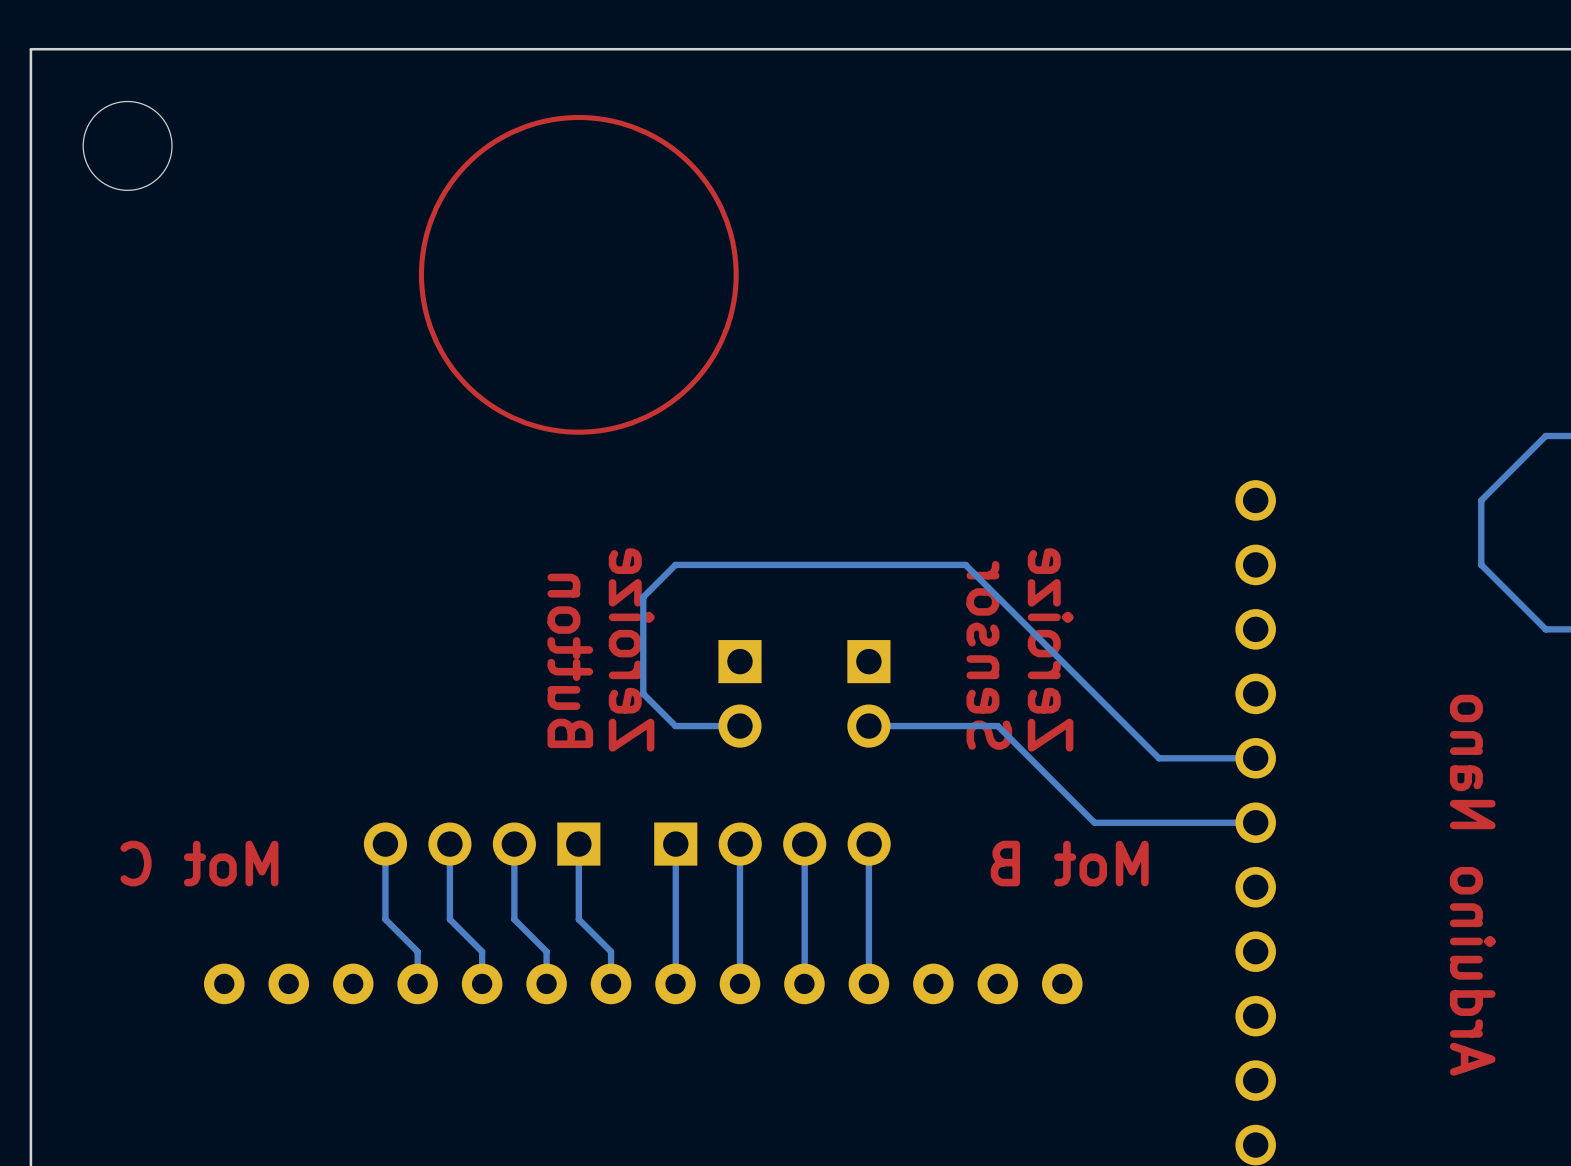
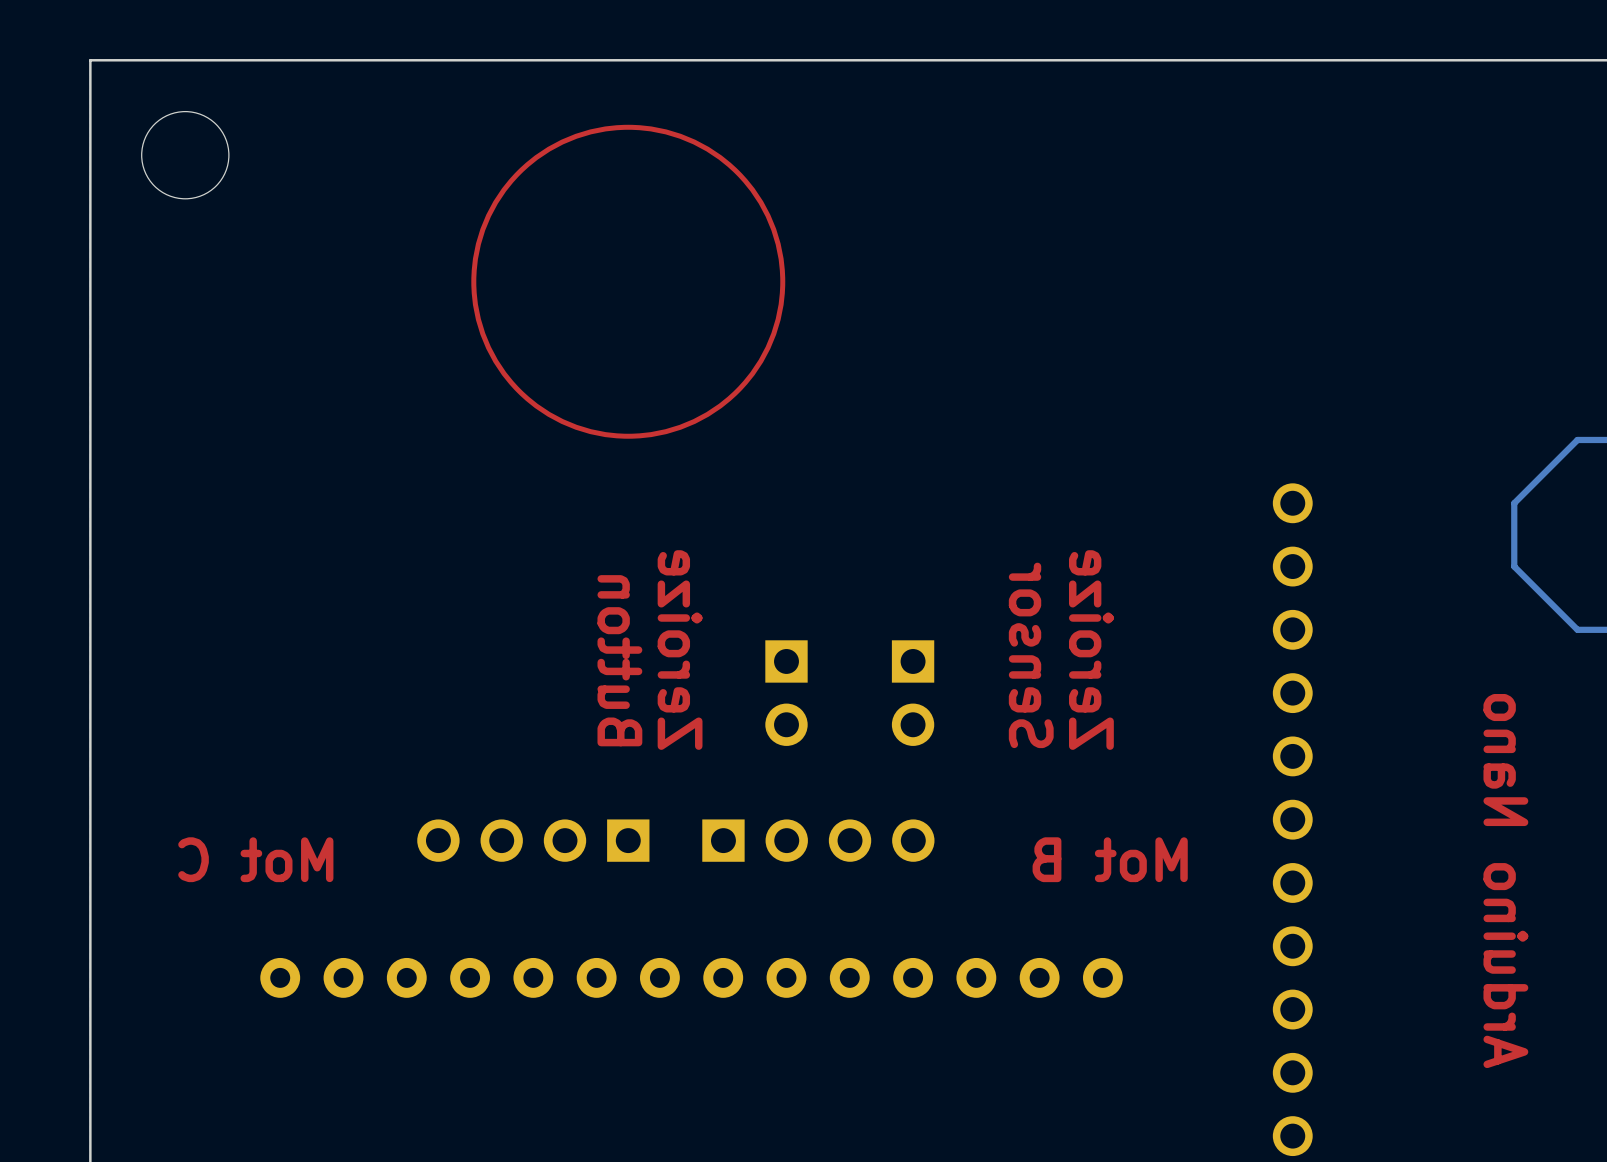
bottom track: (739, 726) (675, 726) (643, 693) (643, 597) (675, 564) (965, 564) (1158, 758) (1255, 758) -> none
bottom track: (868, 726) (997, 726) (1094, 822) (1255, 822) -> none
bottom track: (385, 844) (385, 919) (417, 951) (417, 983) -> none
bottom track: (449, 844) (449, 919) (482, 951) (482, 983) -> none
bottom track: (514, 844) (514, 919) (546, 951) (546, 983) -> none
bottom track: (578, 844) (578, 919) (611, 951) (611, 983) -> none
bottom track: (675, 844) (675, 983) -> none
bottom track: (739, 844) (739, 983) -> none
bottom track: (804, 844) (804, 983) -> none
bottom track: (868, 844) (868, 983) -> none

